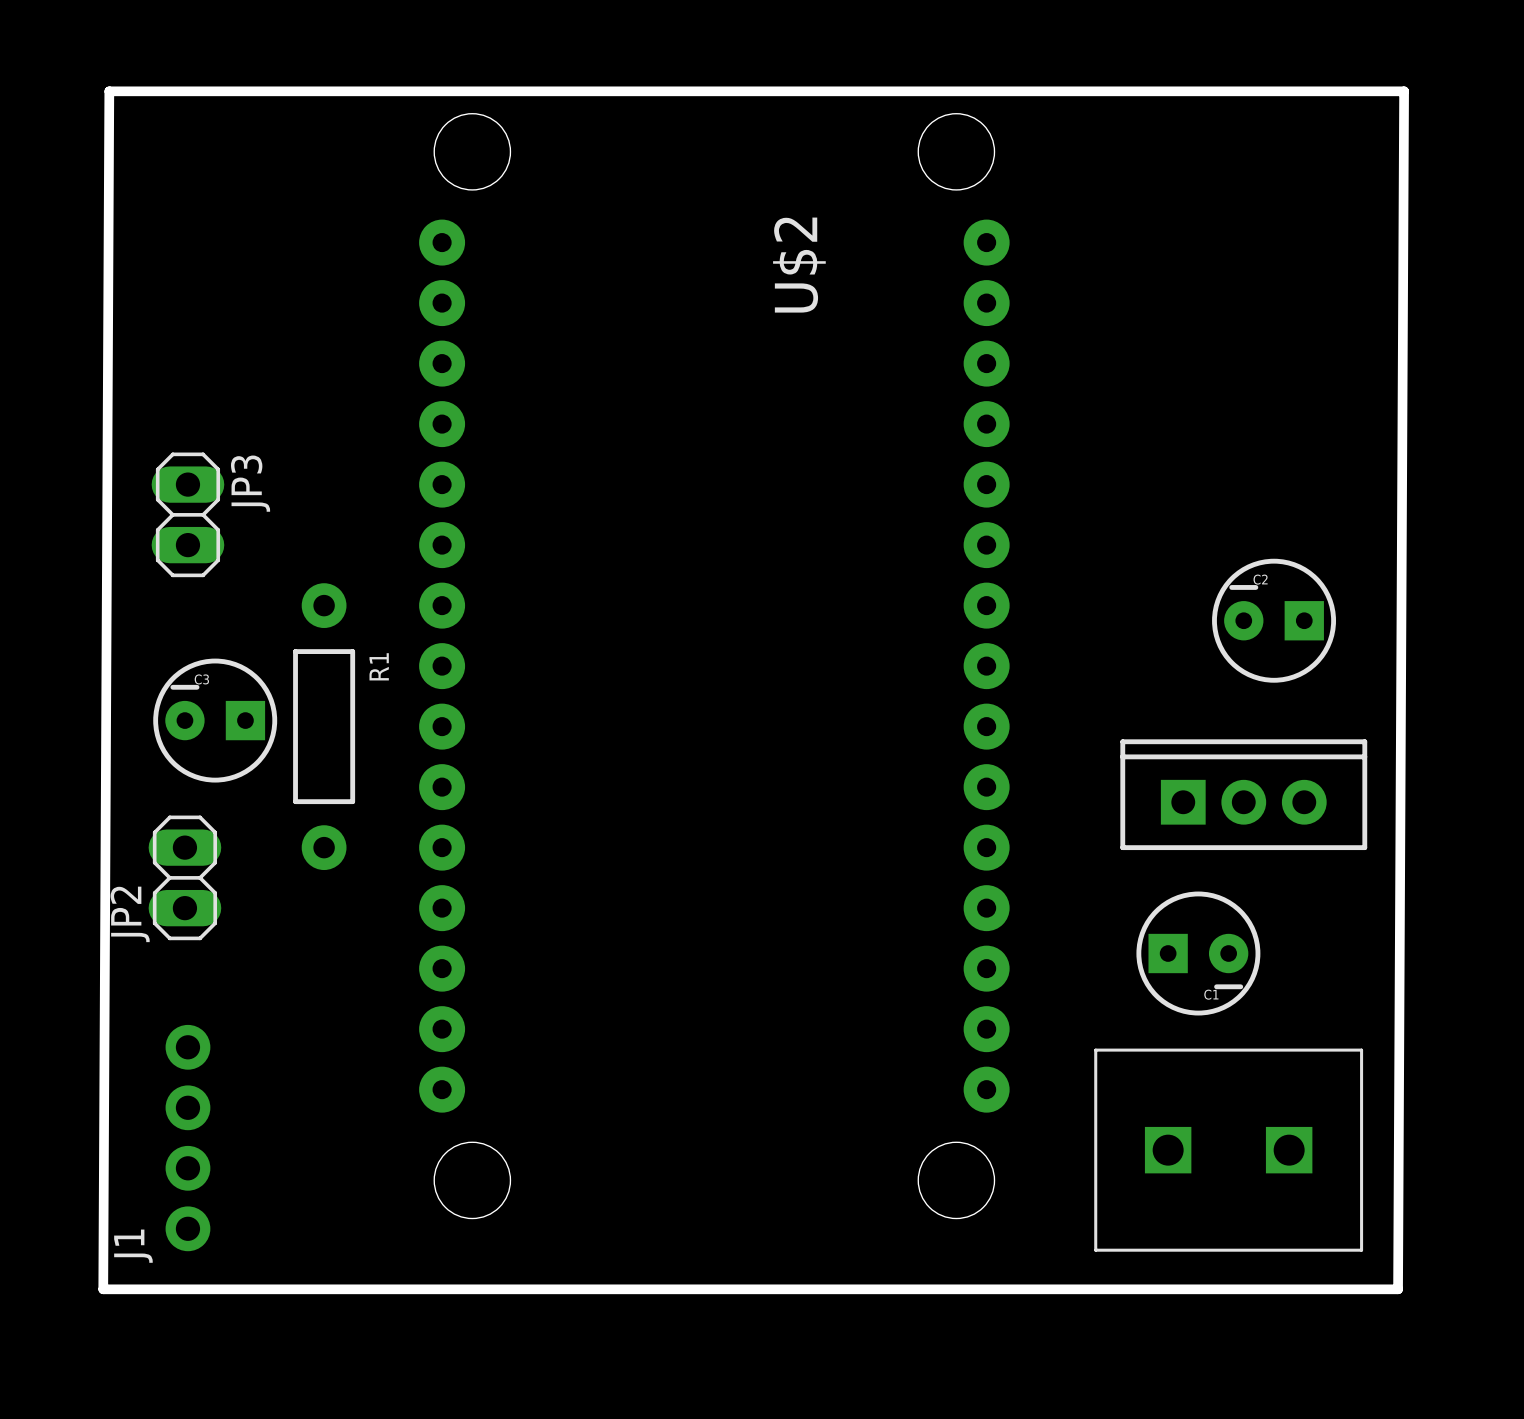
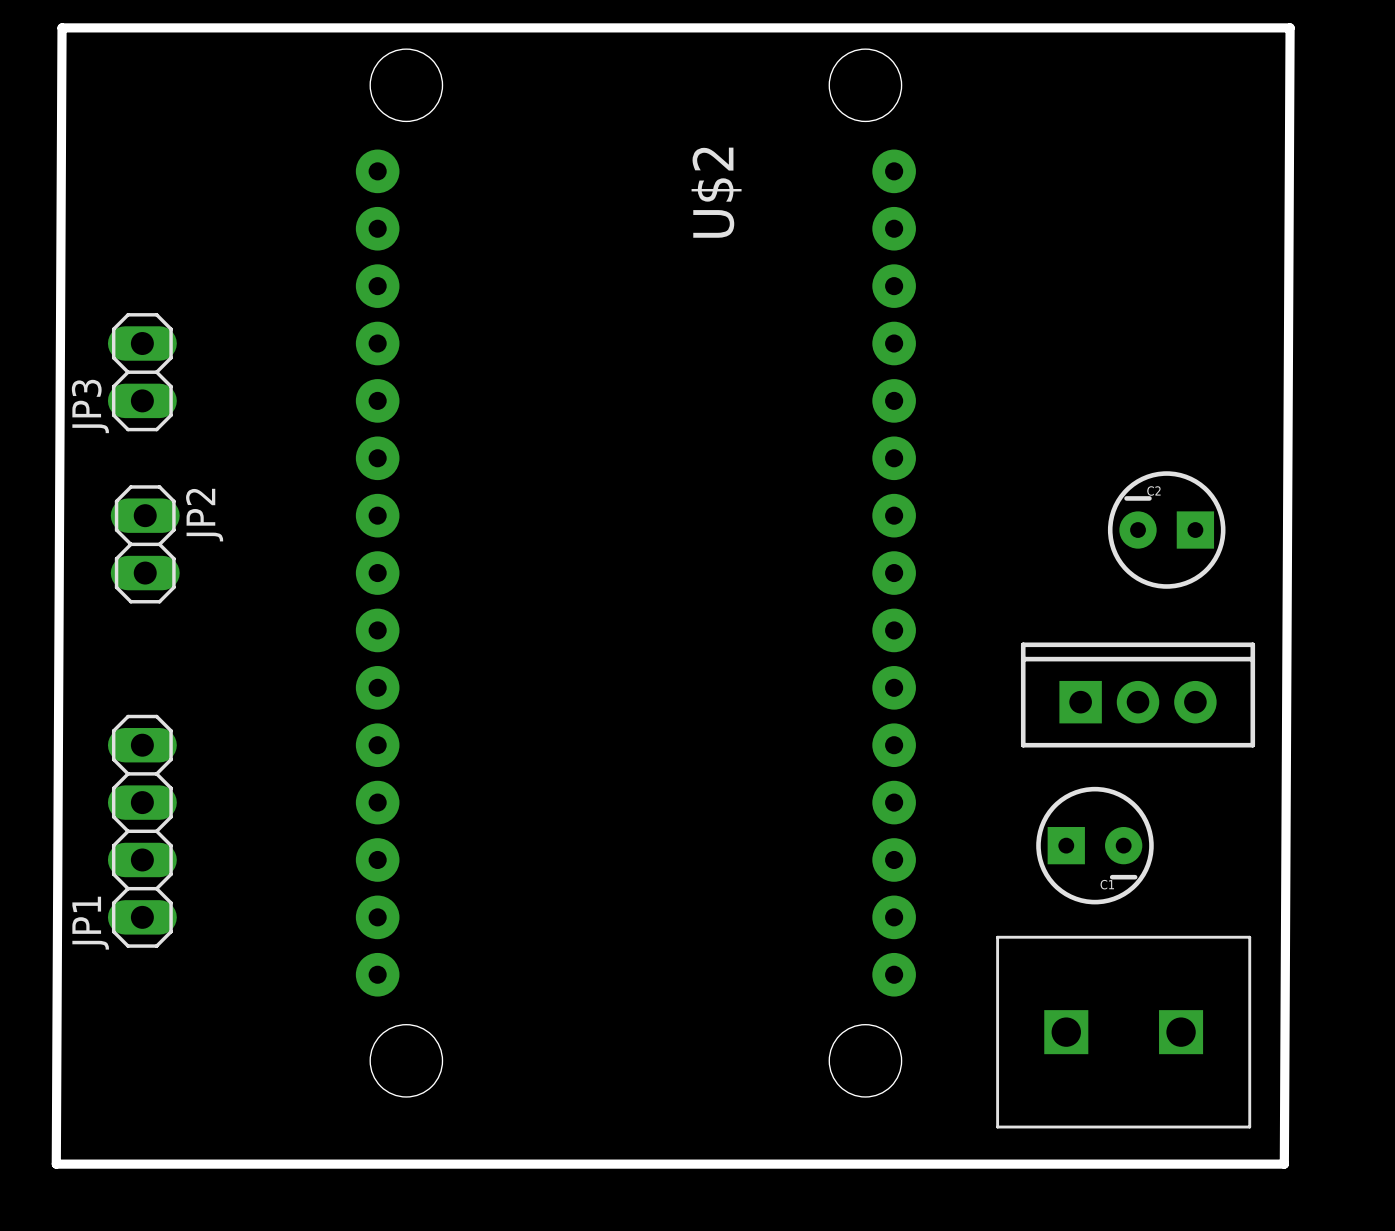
JP3 name position: JP3 (250, 483) -> JP3 (90, 406)
JP3 position: (187, 514) -> (142, 372)
C3: (215, 720) -> none
R1: (324, 726) -> none
JP2 position: (184, 877) -> (145, 544)
JP2 name position: JP2 (130, 914) -> JP2 (204, 515)
JP1: none -> (142, 831)
J1: (187, 1138) -> none

